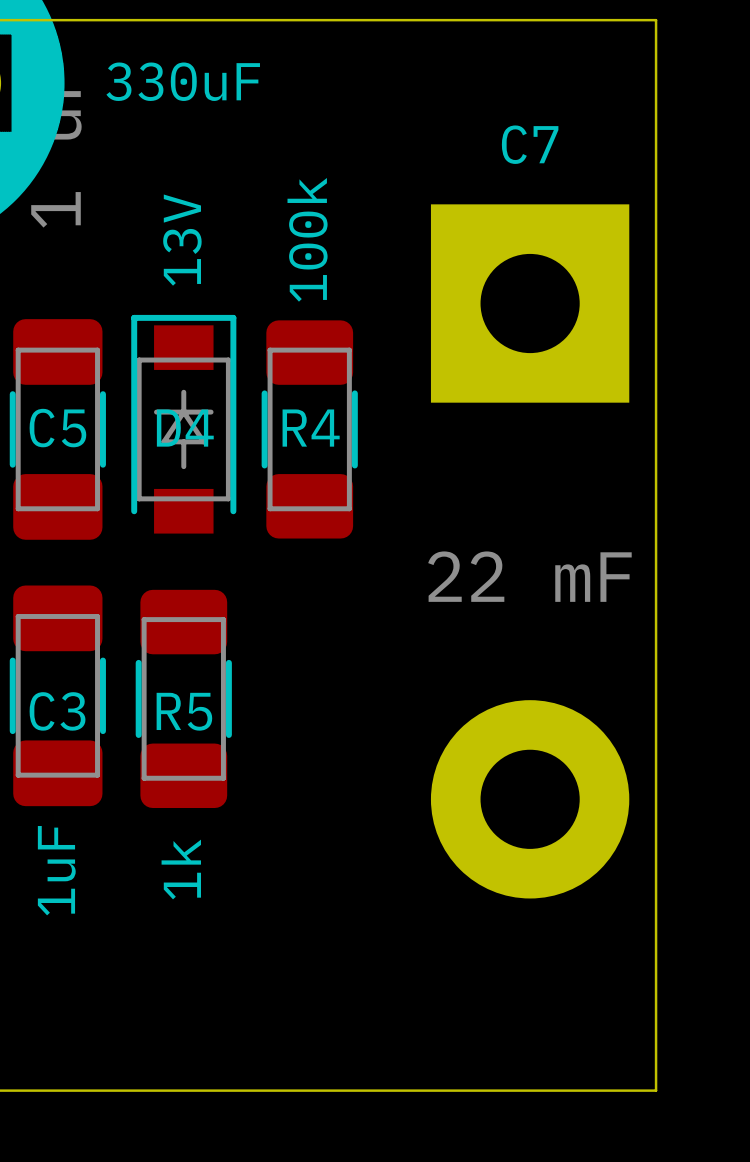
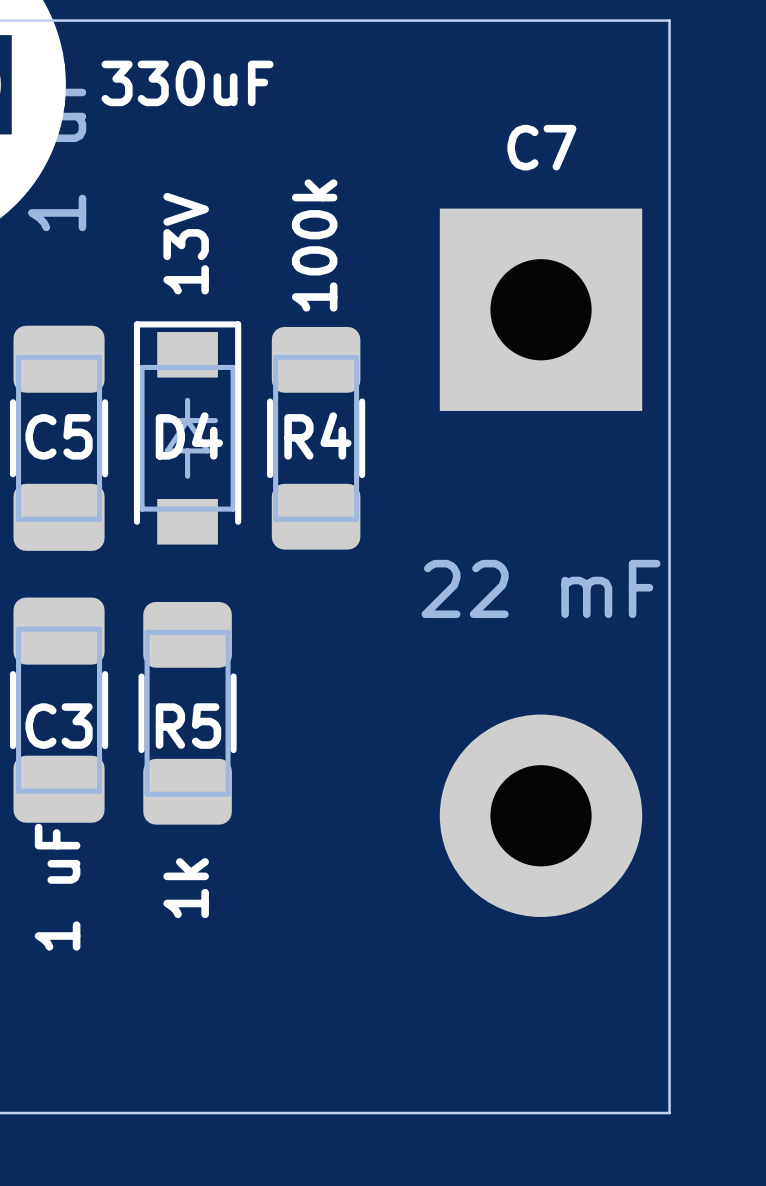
C3 value: 1uF (56, 870) -> 1 uF (57, 887)

